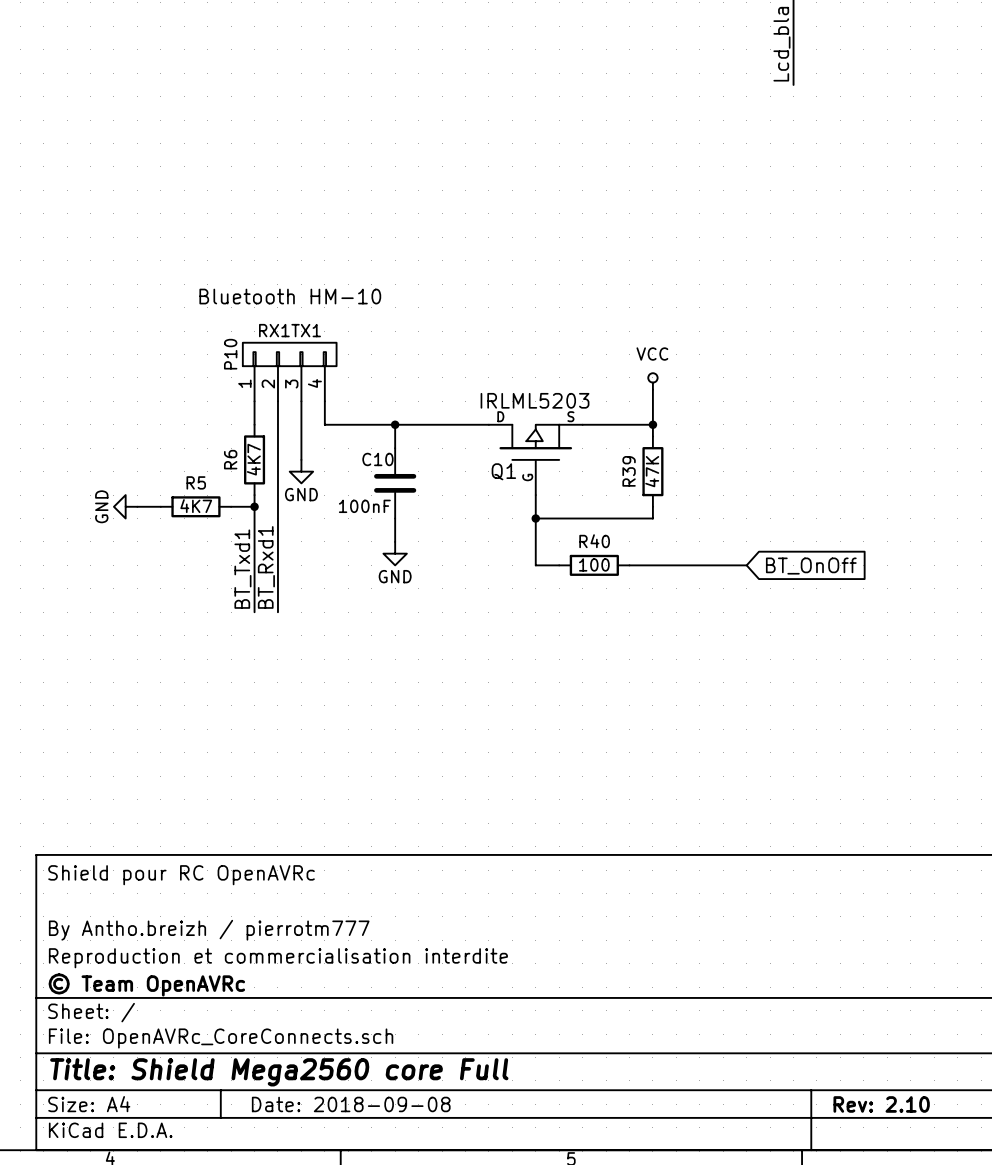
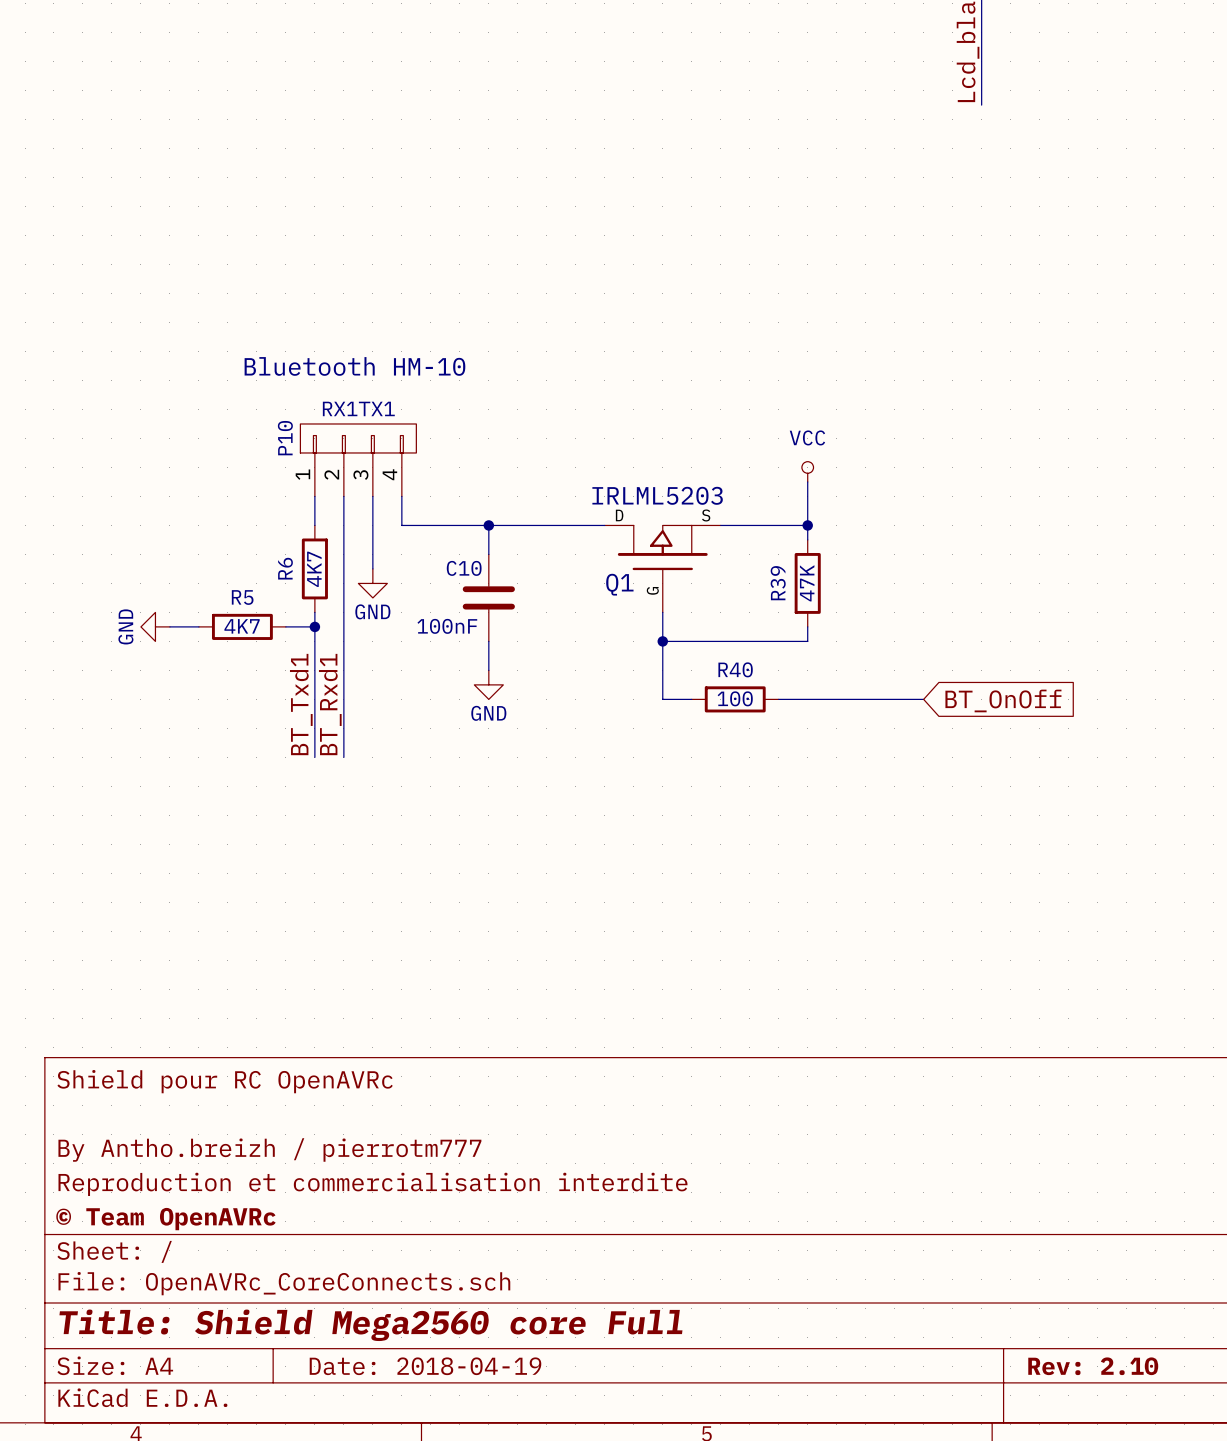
title block: Date: 2018-09-08 (351, 1104) -> Date: 2018-04-19 (425, 1366)

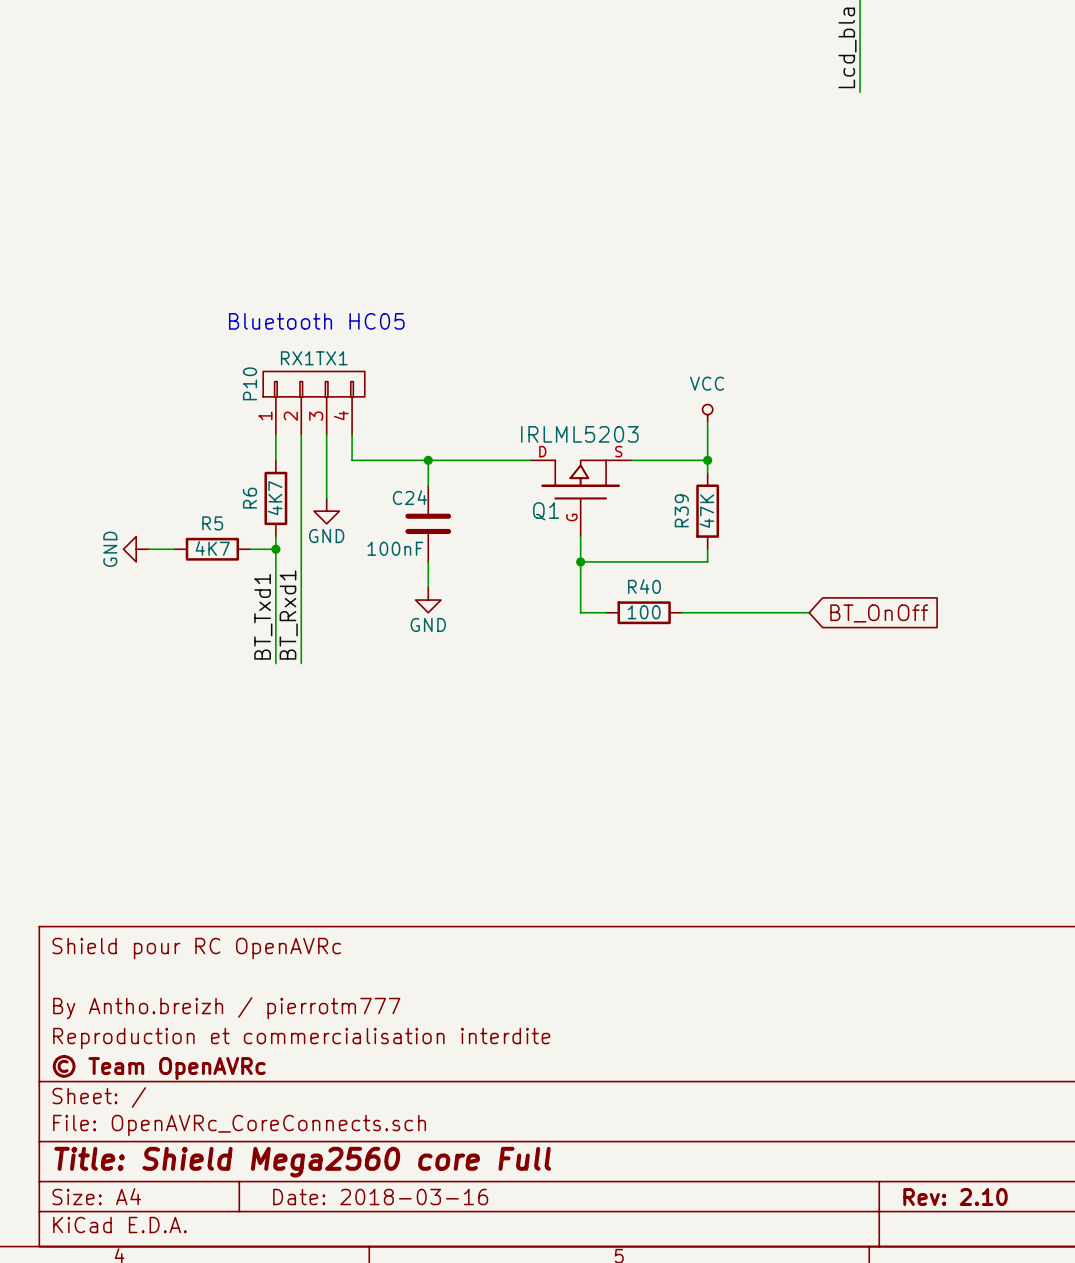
text: Bluetooth HM-10 (354, 366) -> Bluetooth HC05 (316, 321)
C10 name: C10 (464, 568) -> C24 (409, 497)
title block: Date: 2018-04-19 (425, 1366) -> Date: 2018-03-16 (380, 1197)

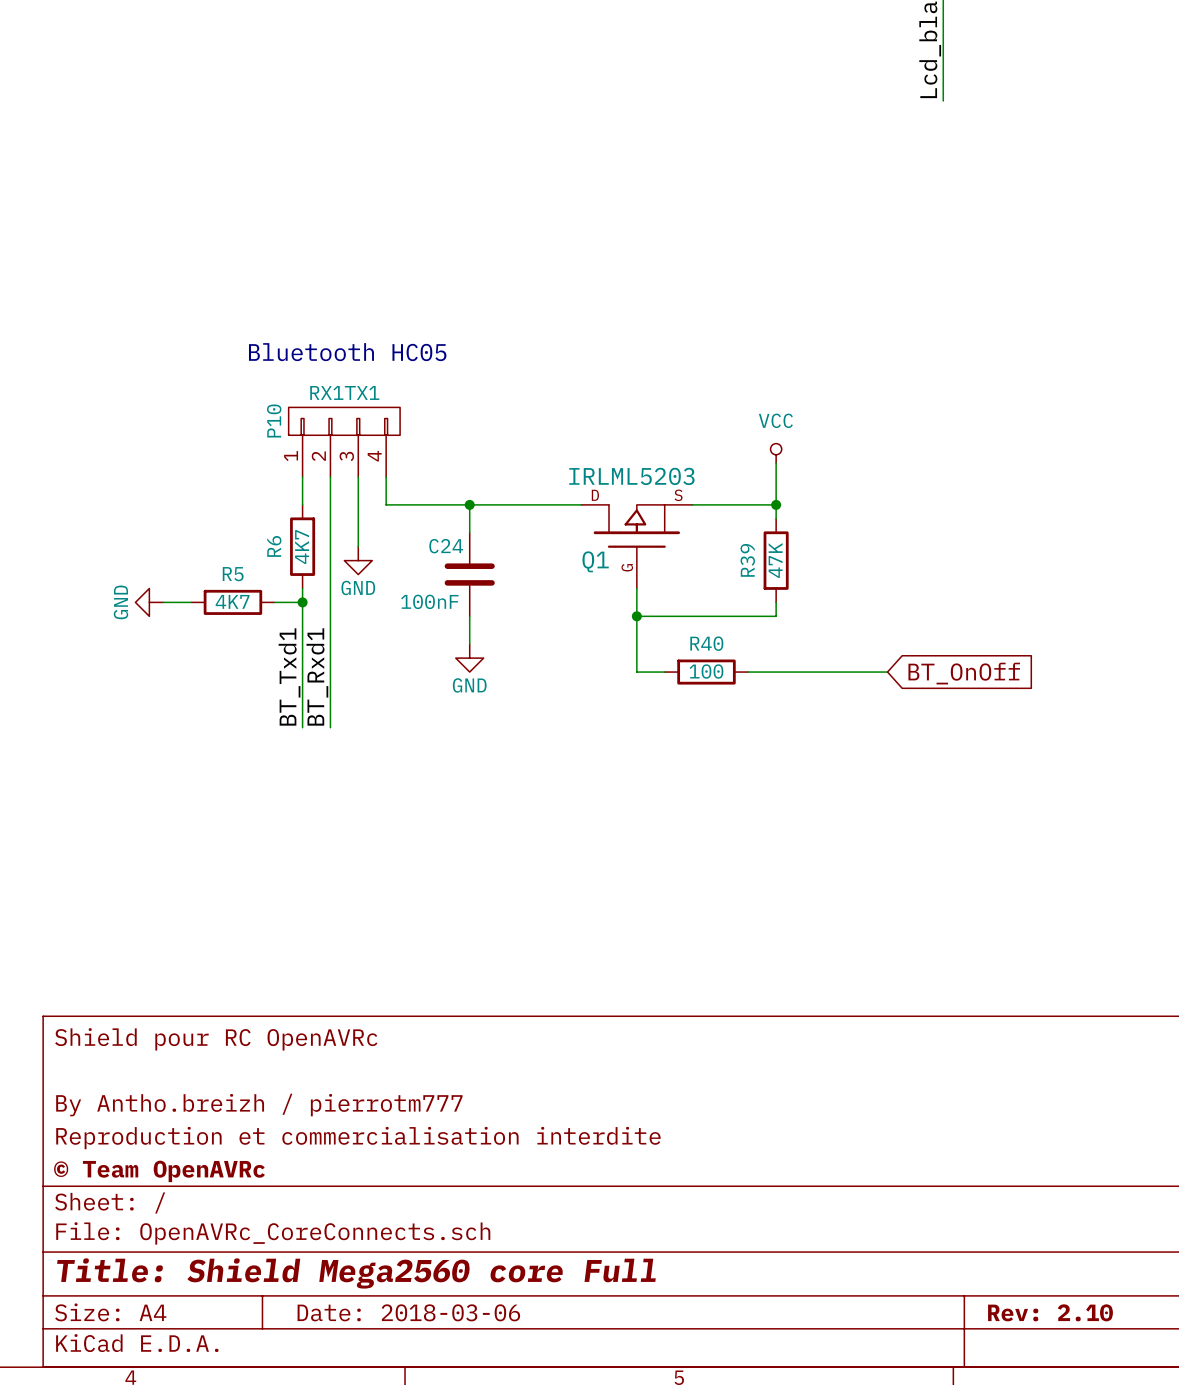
title block: Date: 2018-03-16 (380, 1197) -> Date: 2018-03-06 (408, 1312)

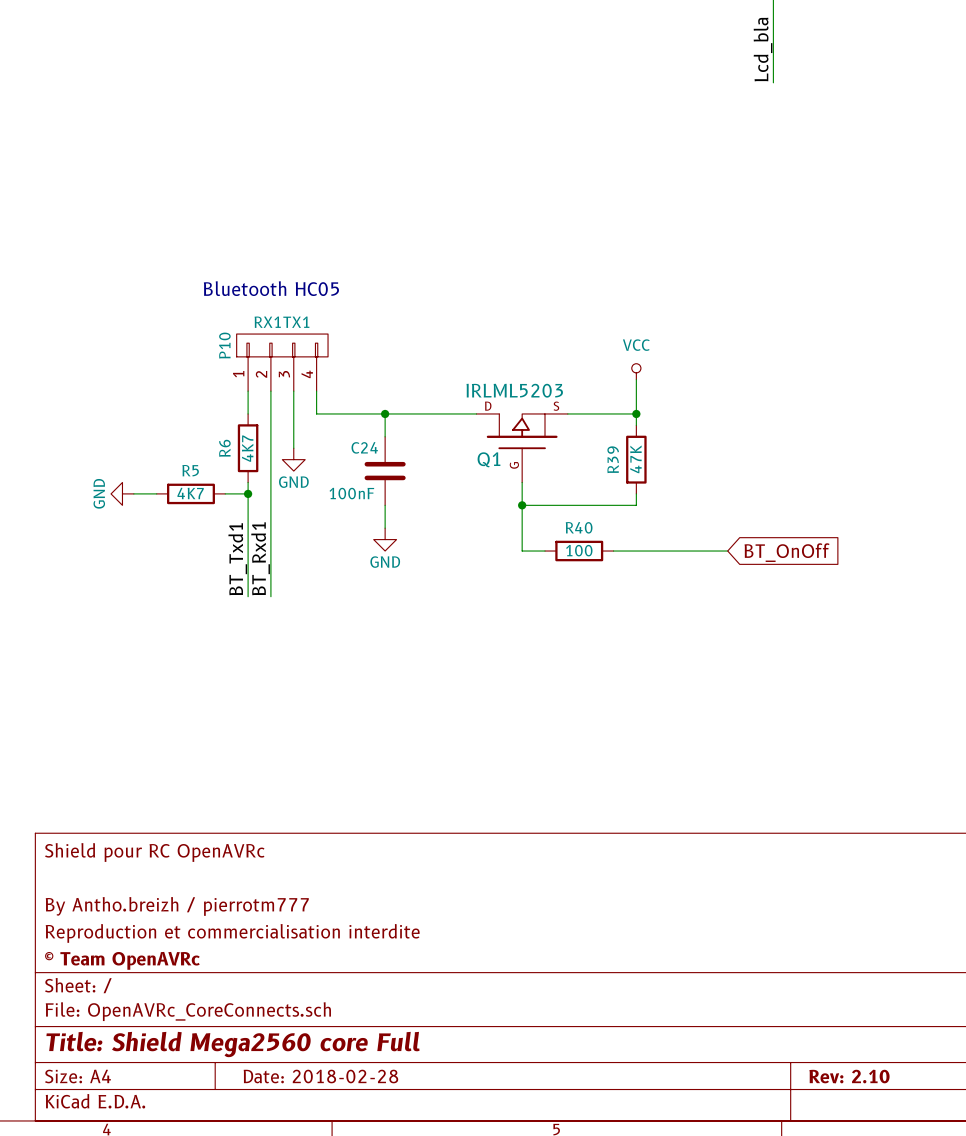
title block: Date: 2018-03-06 (408, 1312) -> Date: 2018-02-28 (320, 1076)

